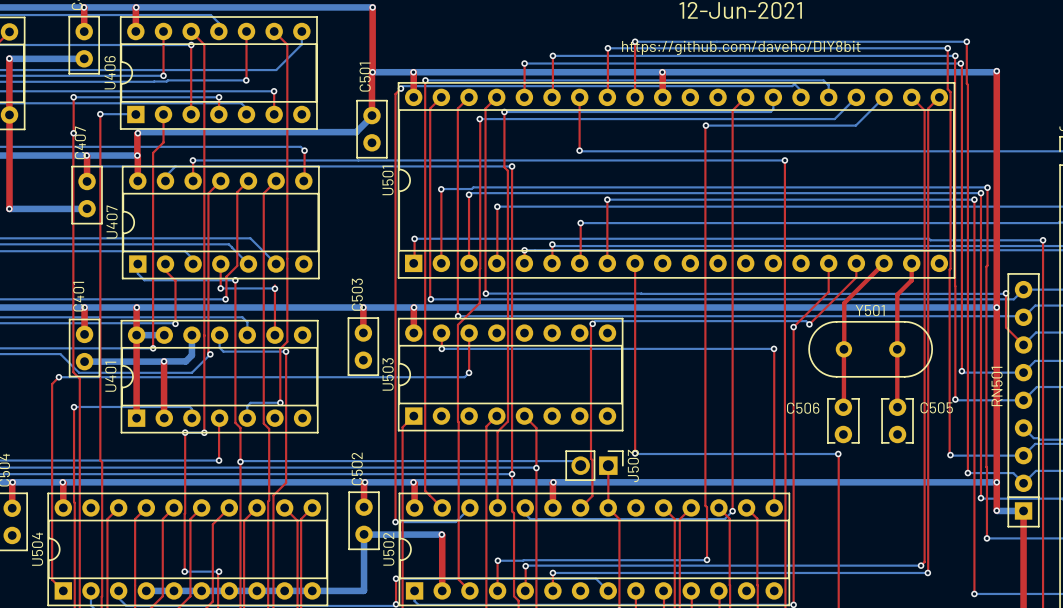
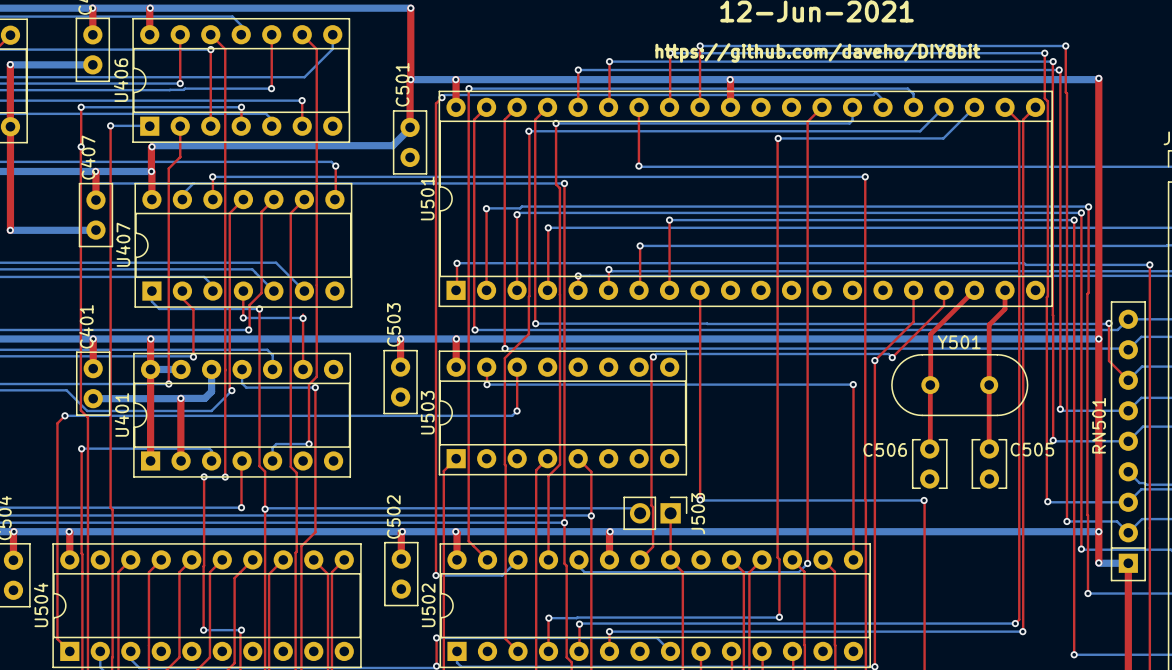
top track: (441, 534) (442, 590) -> none
bottom track: (441, 534) (364, 534) (363, 590) (146, 590) -> none
via: (441, 534) -> none

